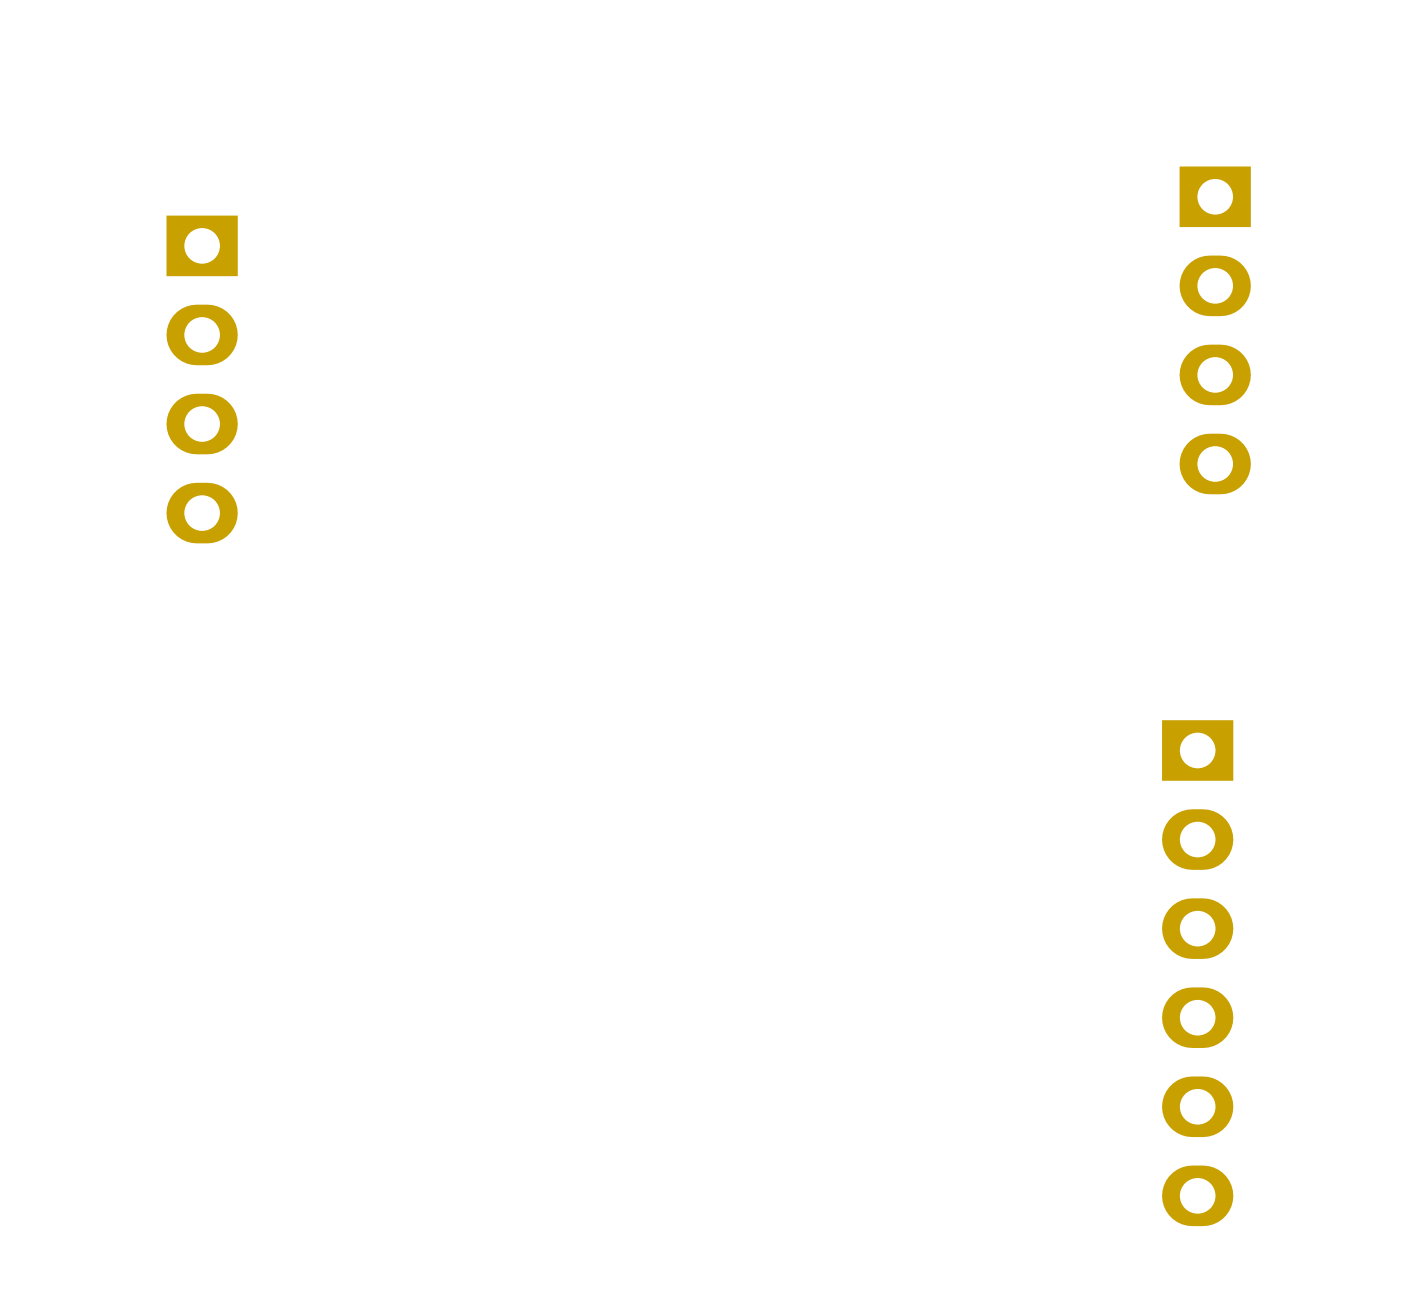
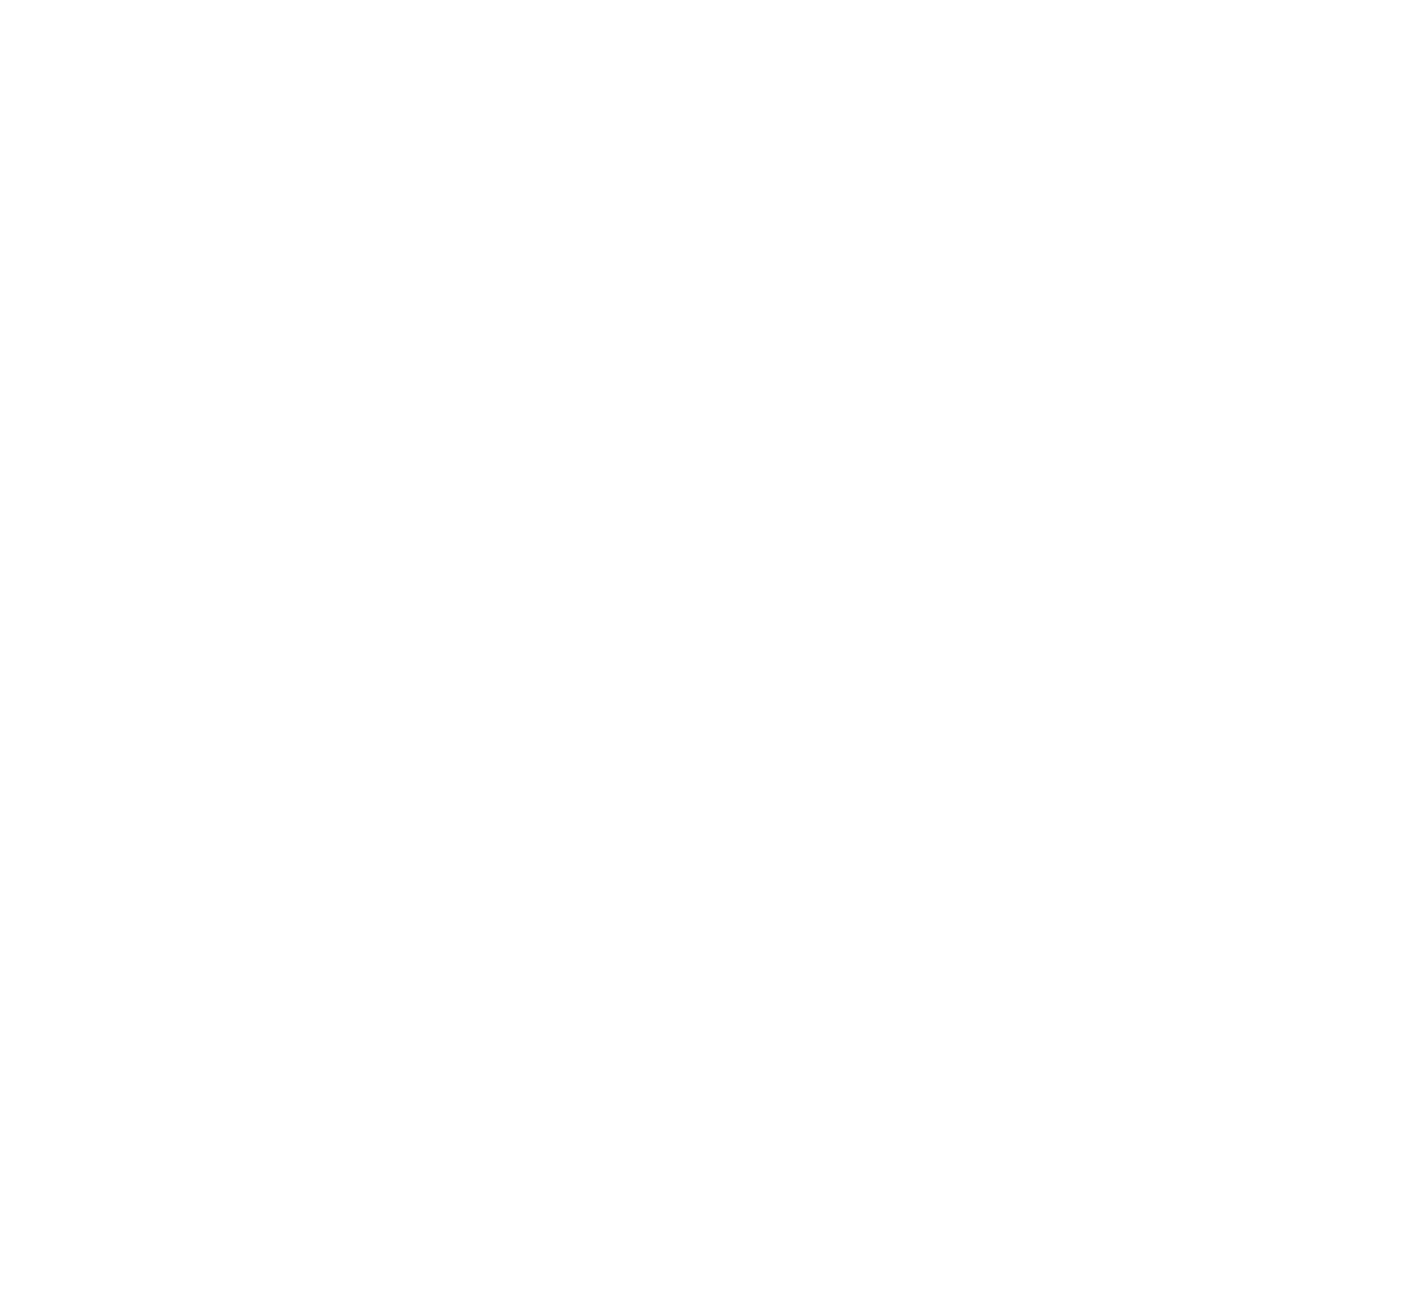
part: (1215, 330) -> none
part: (202, 379) -> none
part: (1197, 973) -> none

